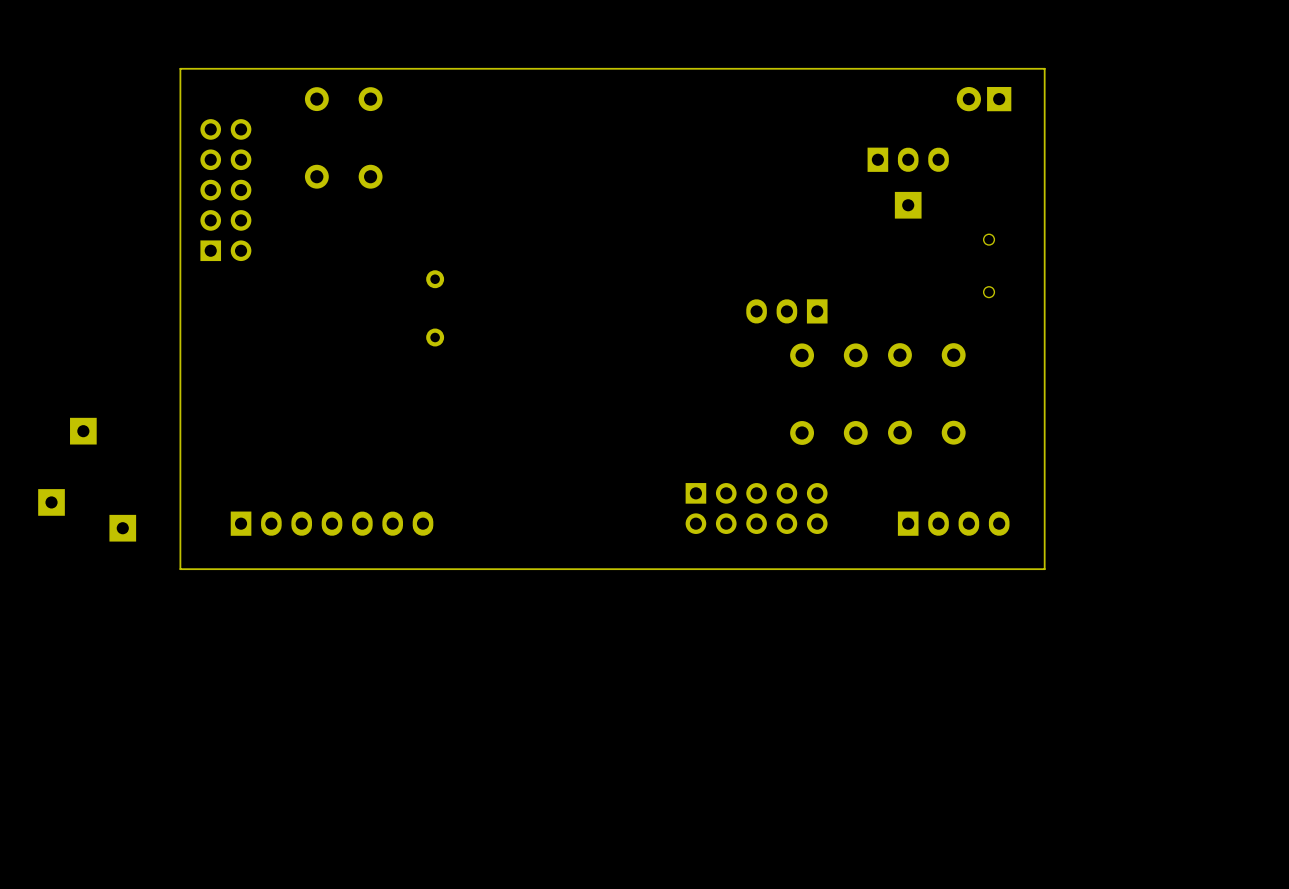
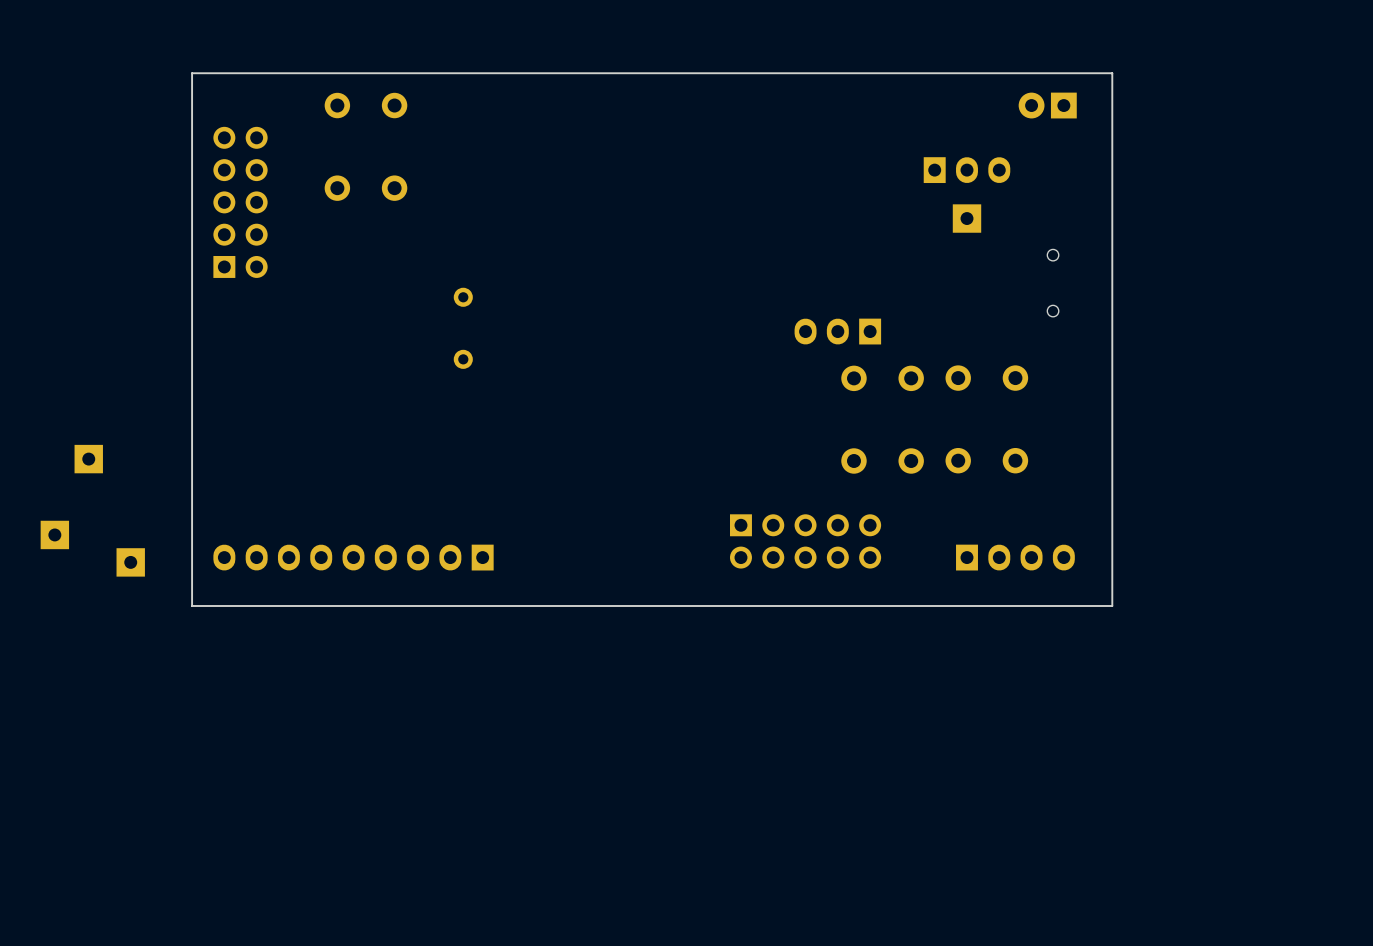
part footprint: [230, 511, 434, 536] -> [213, 544, 494, 571]

